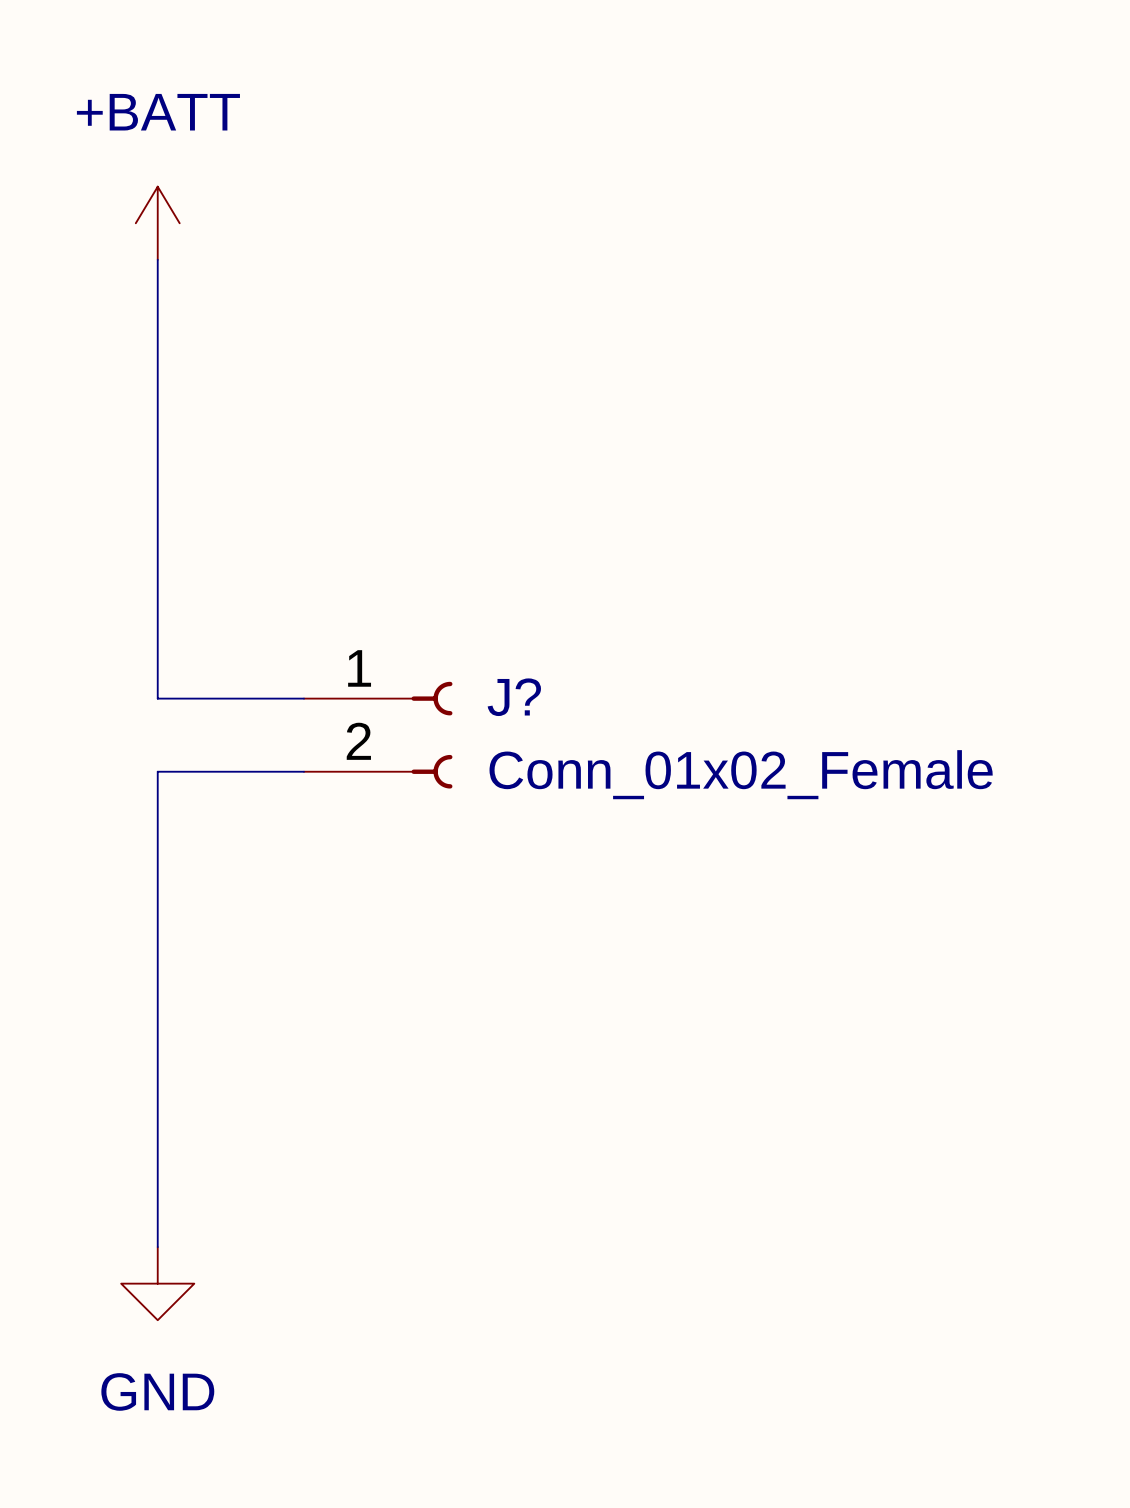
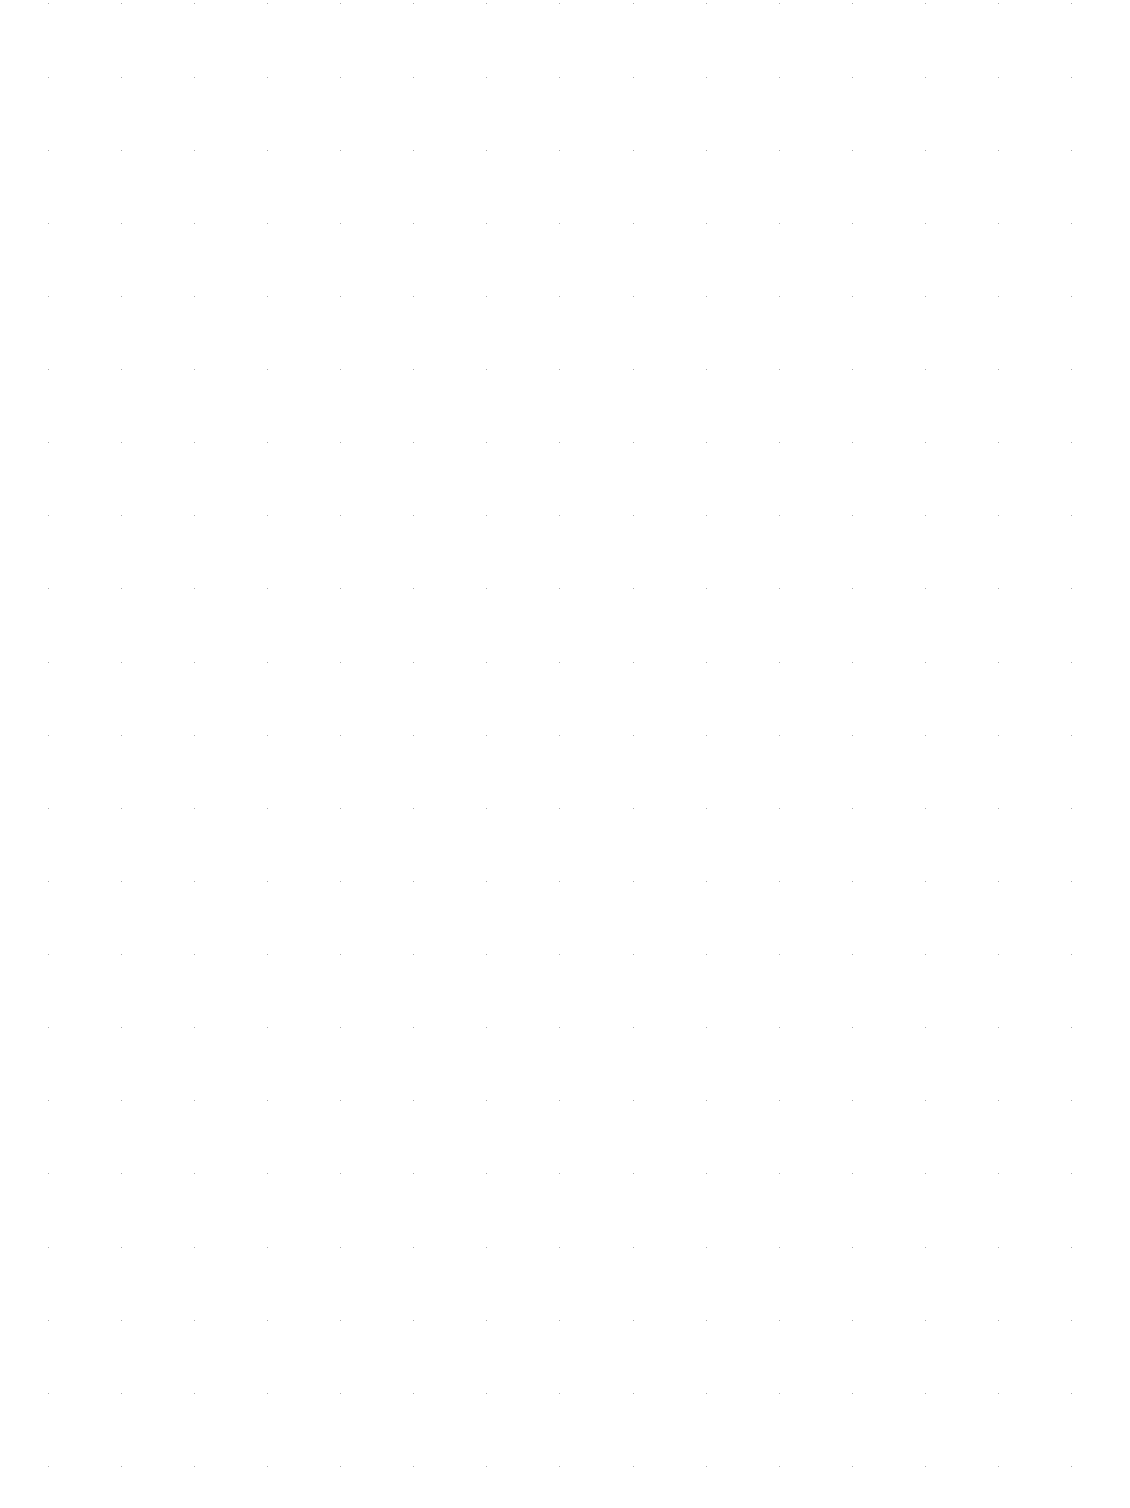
power symbol: +BATT (157, 223) -> none
wire: (157, 259) (157, 698) (304, 698) -> none
J?: Conn_01x02_Female (378, 735) -> none
wire: (304, 771) (157, 771) (157, 1247) -> none
power symbol: GND (157, 1283) -> none

